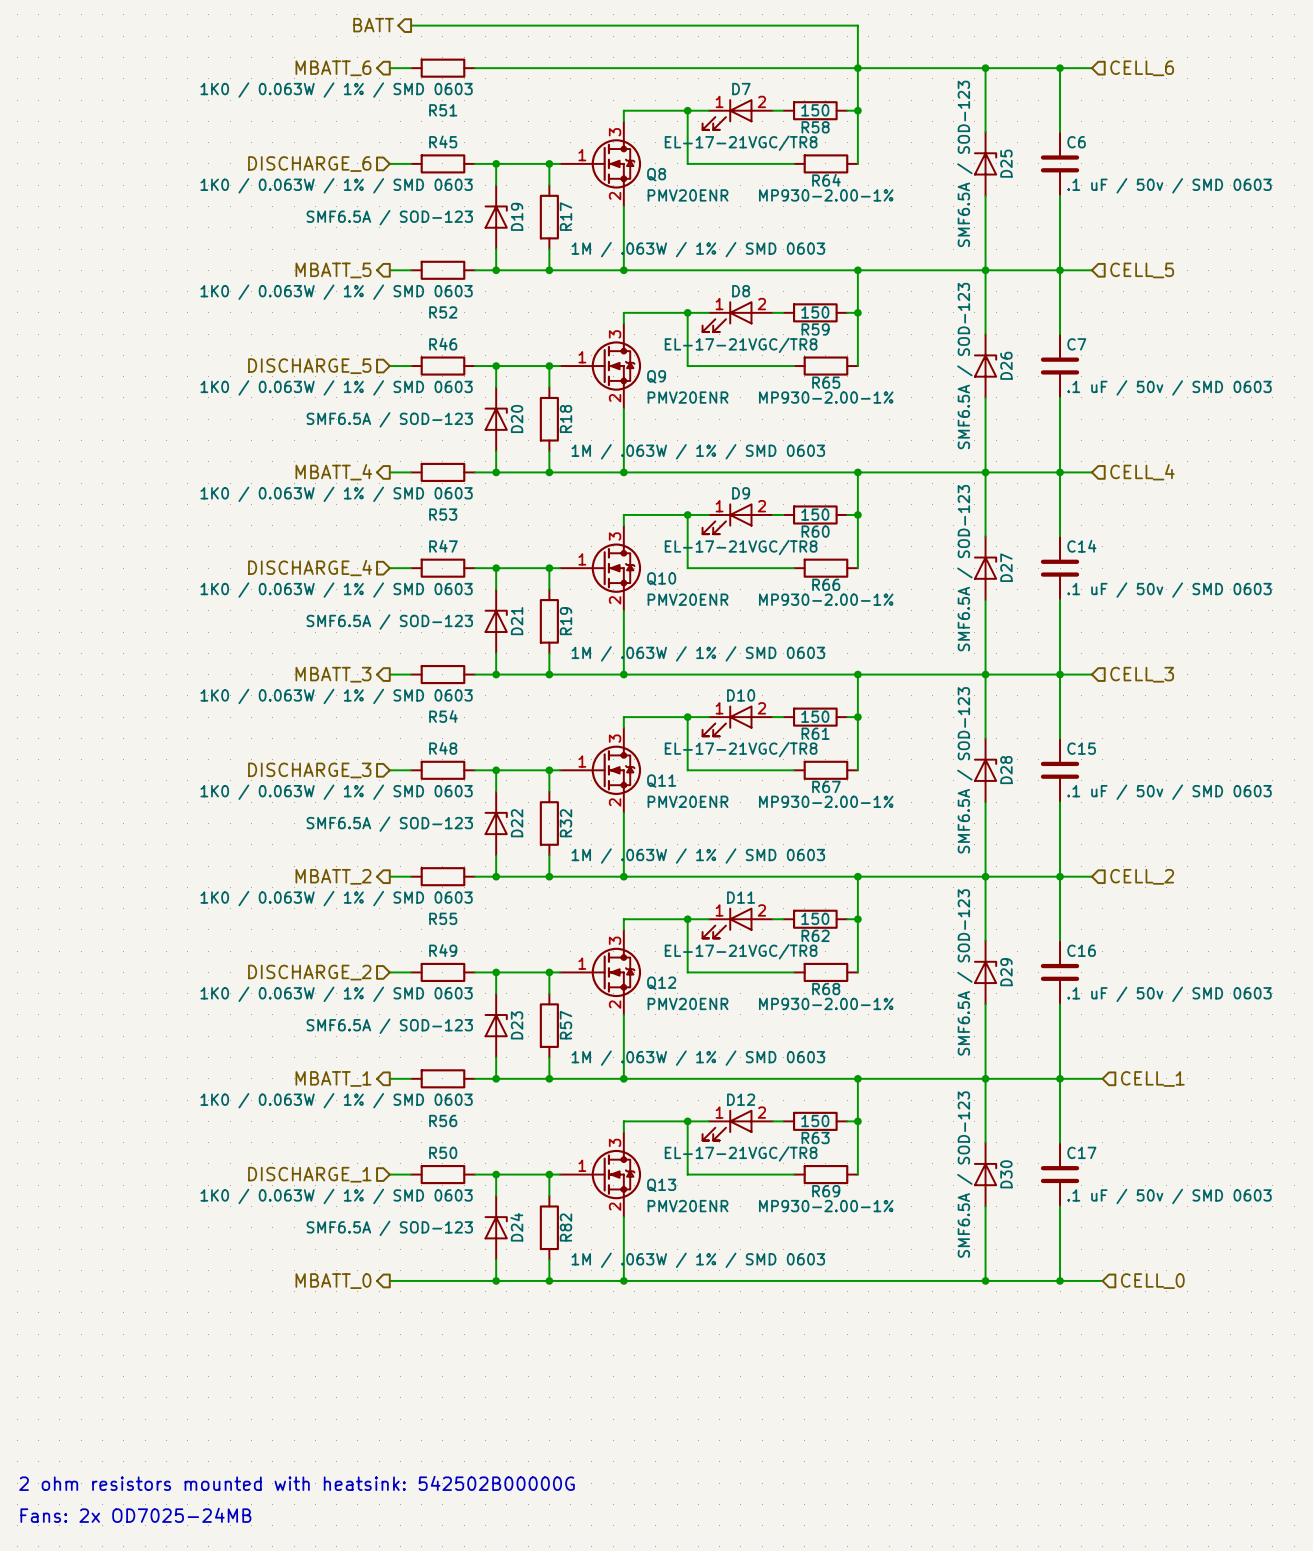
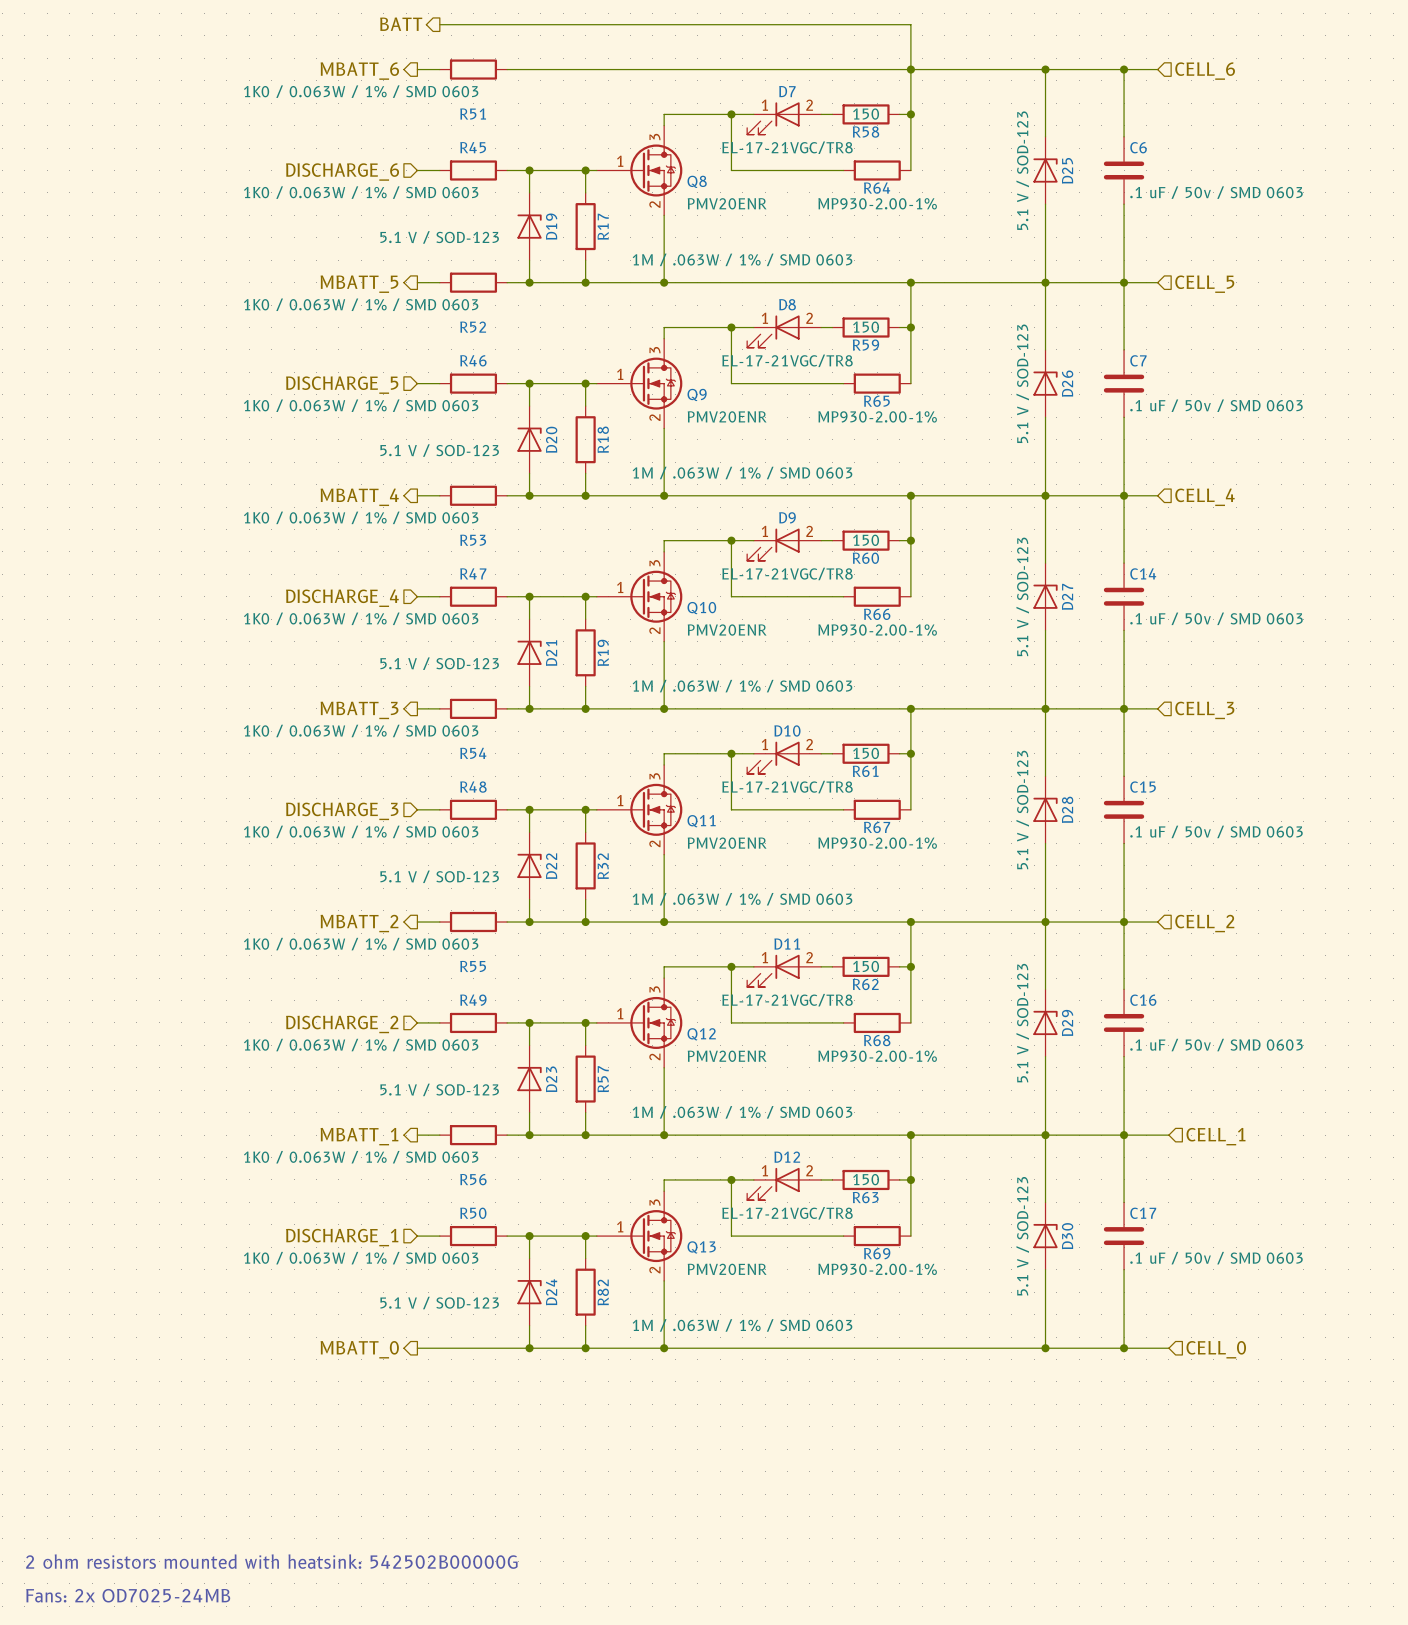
D25 value: SMF6.5A / SOD-123 (964, 163) -> 5.1 V / SOD-123 (1022, 170)
D19 value: SMF6.5A / SOD-123 (389, 217) -> 5.1 V / SOD-123 (439, 237)
D26 value: SMF6.5A / SOD-123 (964, 366) -> 5.1 V / SOD-123 (1022, 383)
D20 value: SMF6.5A / SOD-123 (389, 419) -> 5.1 V / SOD-123 (439, 450)
D27 value: SMF6.5A / SOD-123 (964, 568) -> 5.1 V / SOD-123 (1022, 596)
D21 value: SMF6.5A / SOD-123 (389, 621) -> 5.1 V / SOD-123 (439, 663)
D28 value: SMF6.5A / SOD-123 (964, 770) -> 5.1 V / SOD-123 (1022, 809)
D22 value: SMF6.5A / SOD-123 (389, 824) -> 5.1 V / SOD-123 (439, 876)
D29 value: SMF6.5A / SOD-123 (964, 972) -> 5.1 V / SOD-123 (1022, 1023)
D23 value: SMF6.5A / SOD-123 (389, 1026) -> 5.1 V / SOD-123 (439, 1089)
D30 value: SMF6.5A / SOD-123 (964, 1174) -> 5.1 V / SOD-123 (1022, 1236)
D24 value: SMF6.5A / SOD-123 (389, 1228) -> 5.1 V / SOD-123 (439, 1303)

